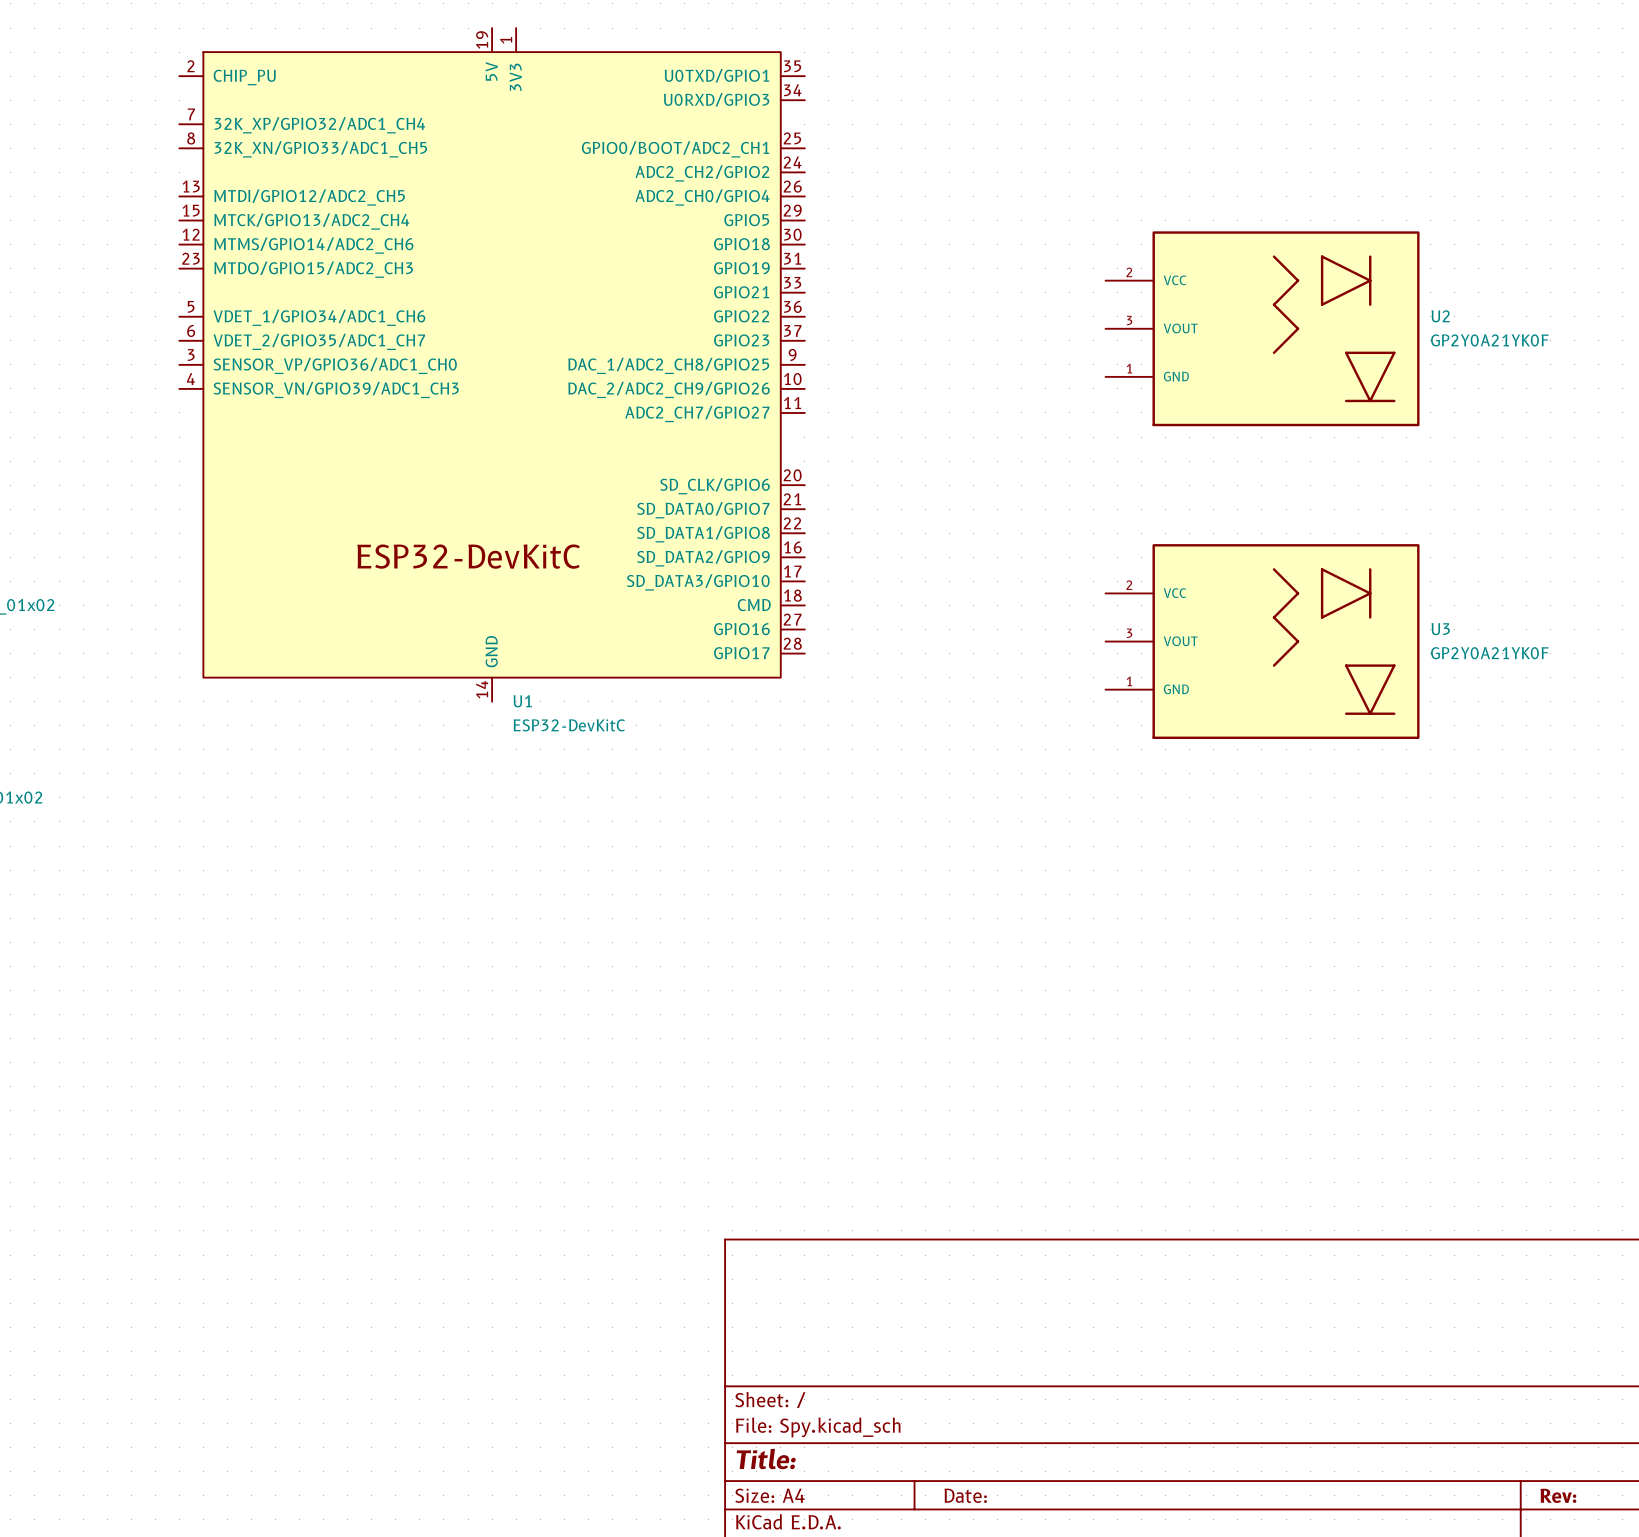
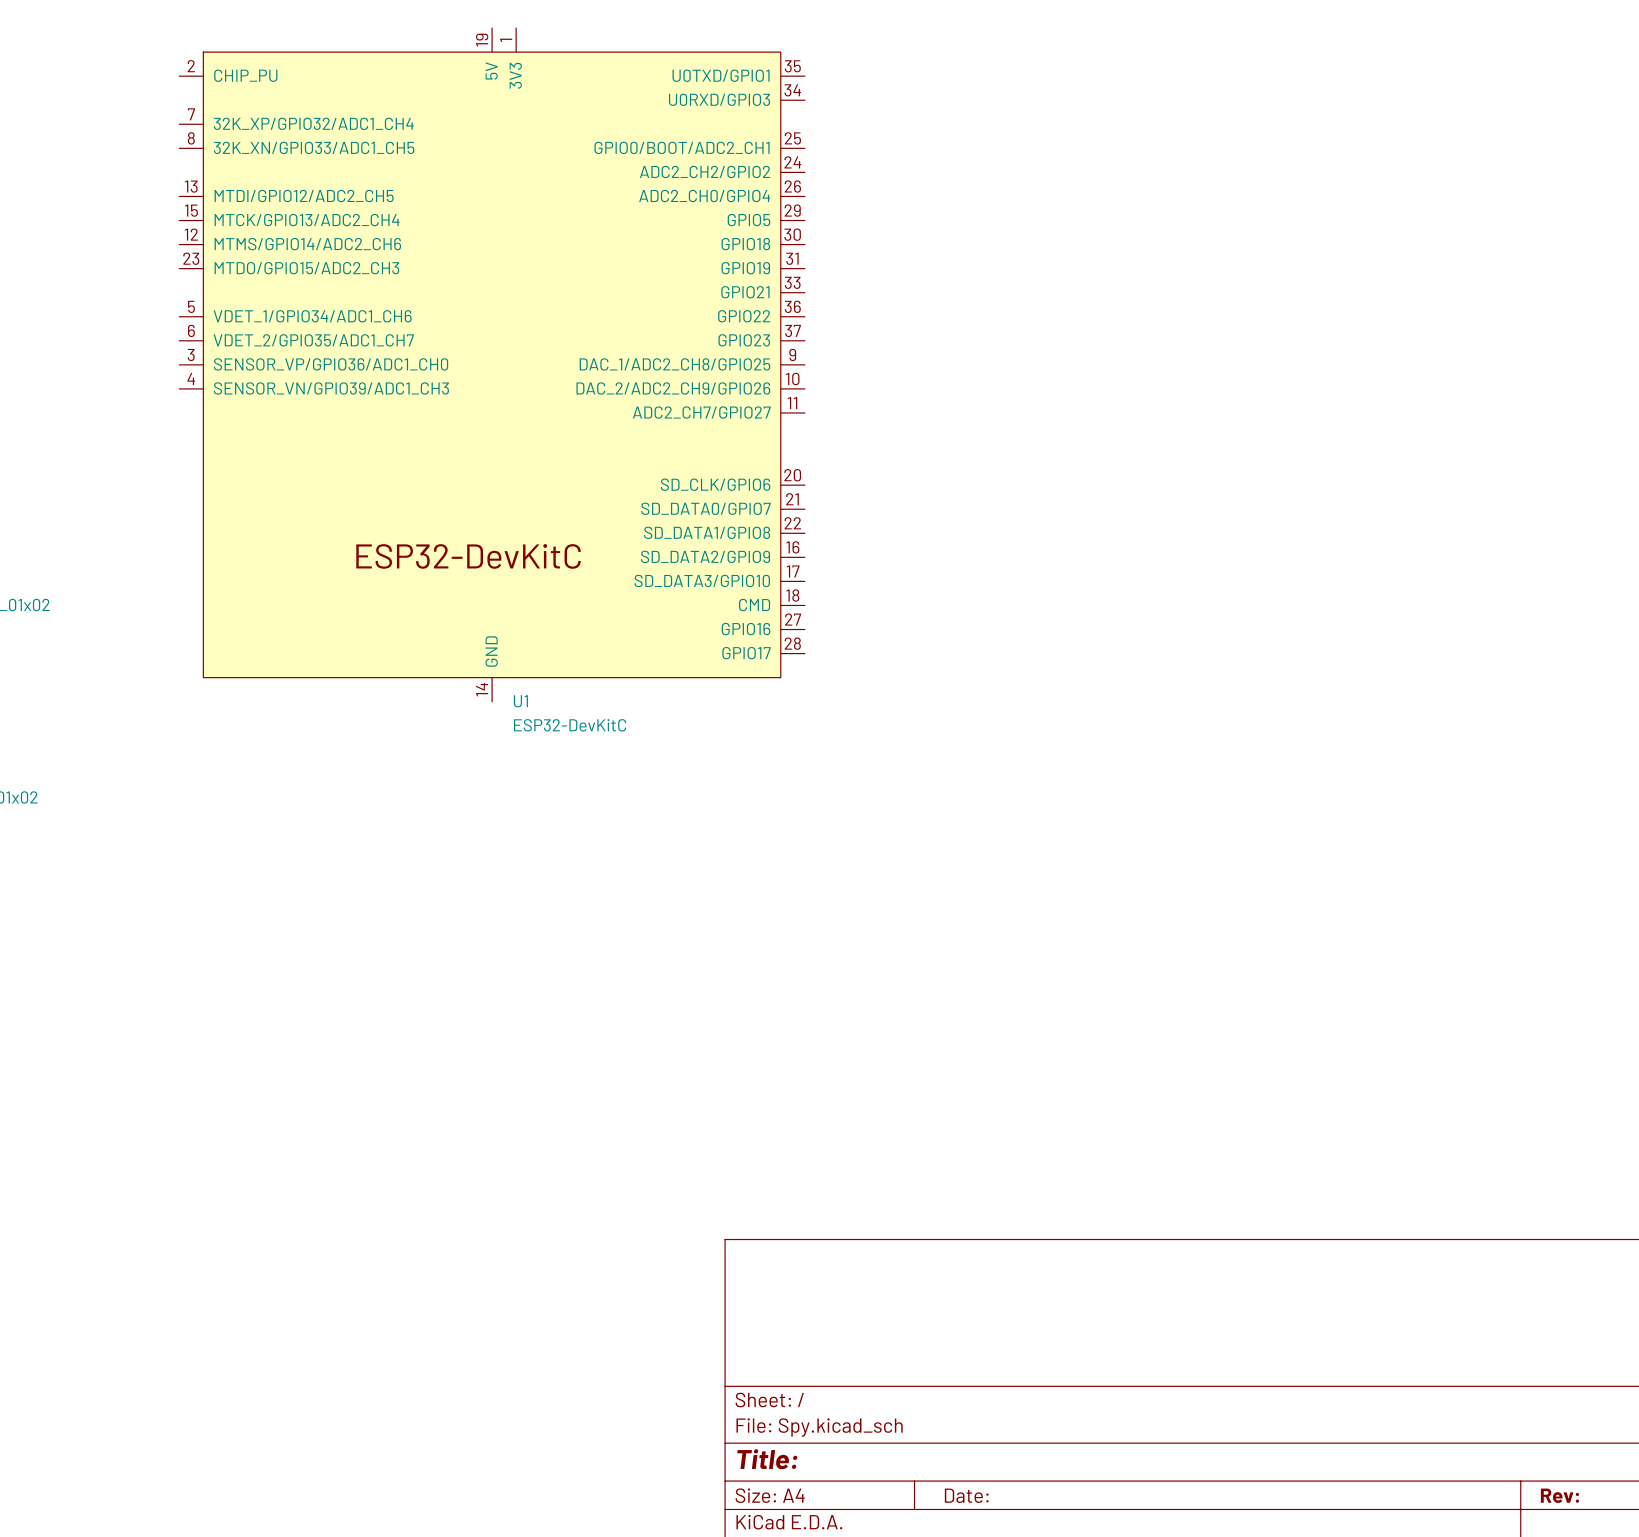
U2: GP2Y0A21YK0F (1262, 328) -> none
U3: GP2Y0A21YK0F (1262, 641) -> none

